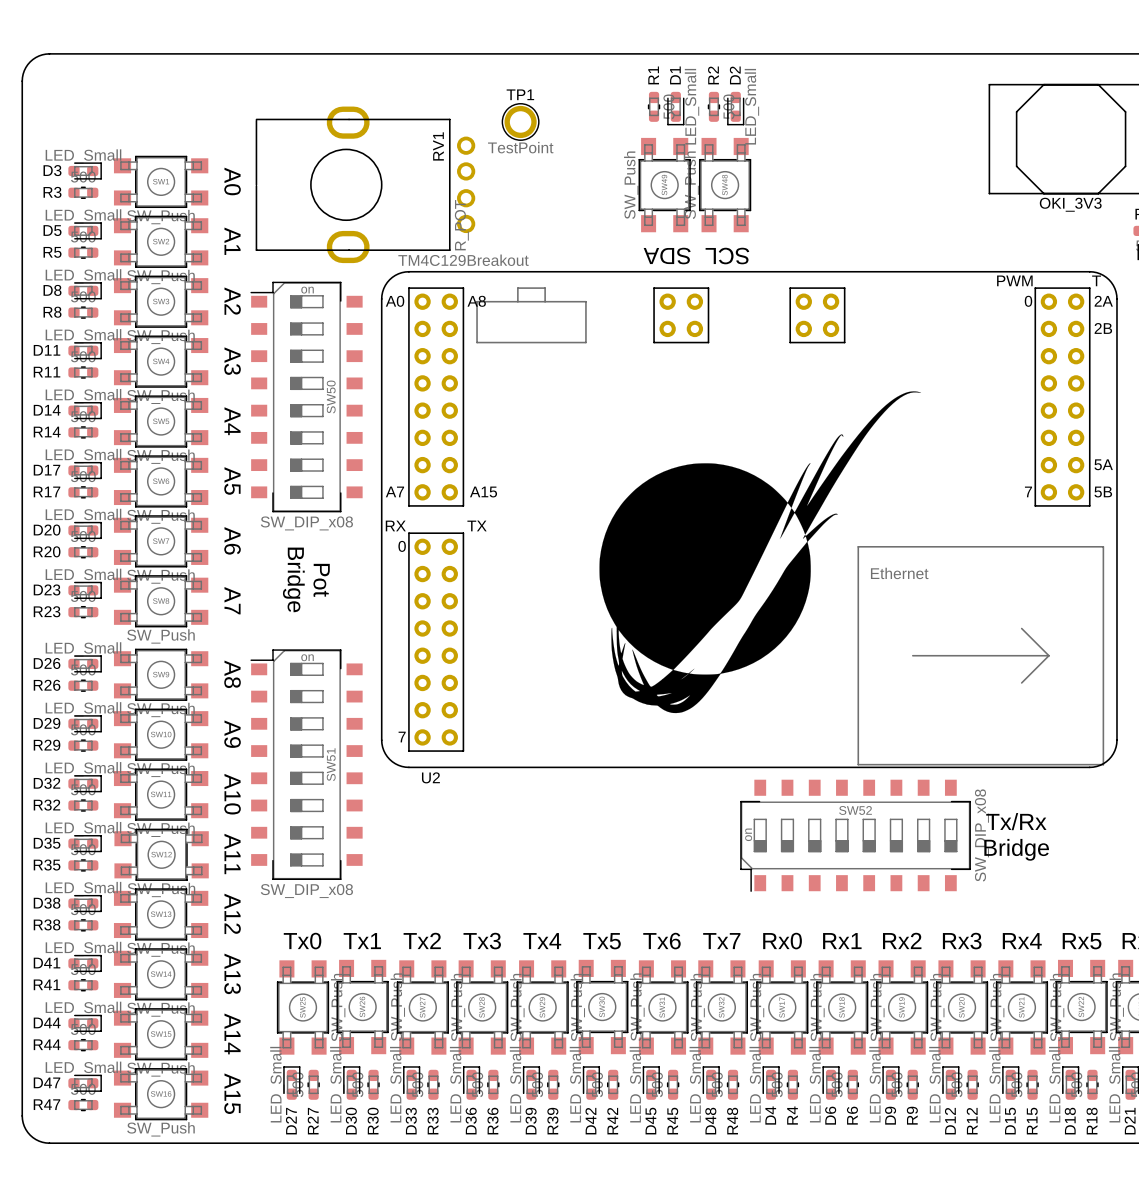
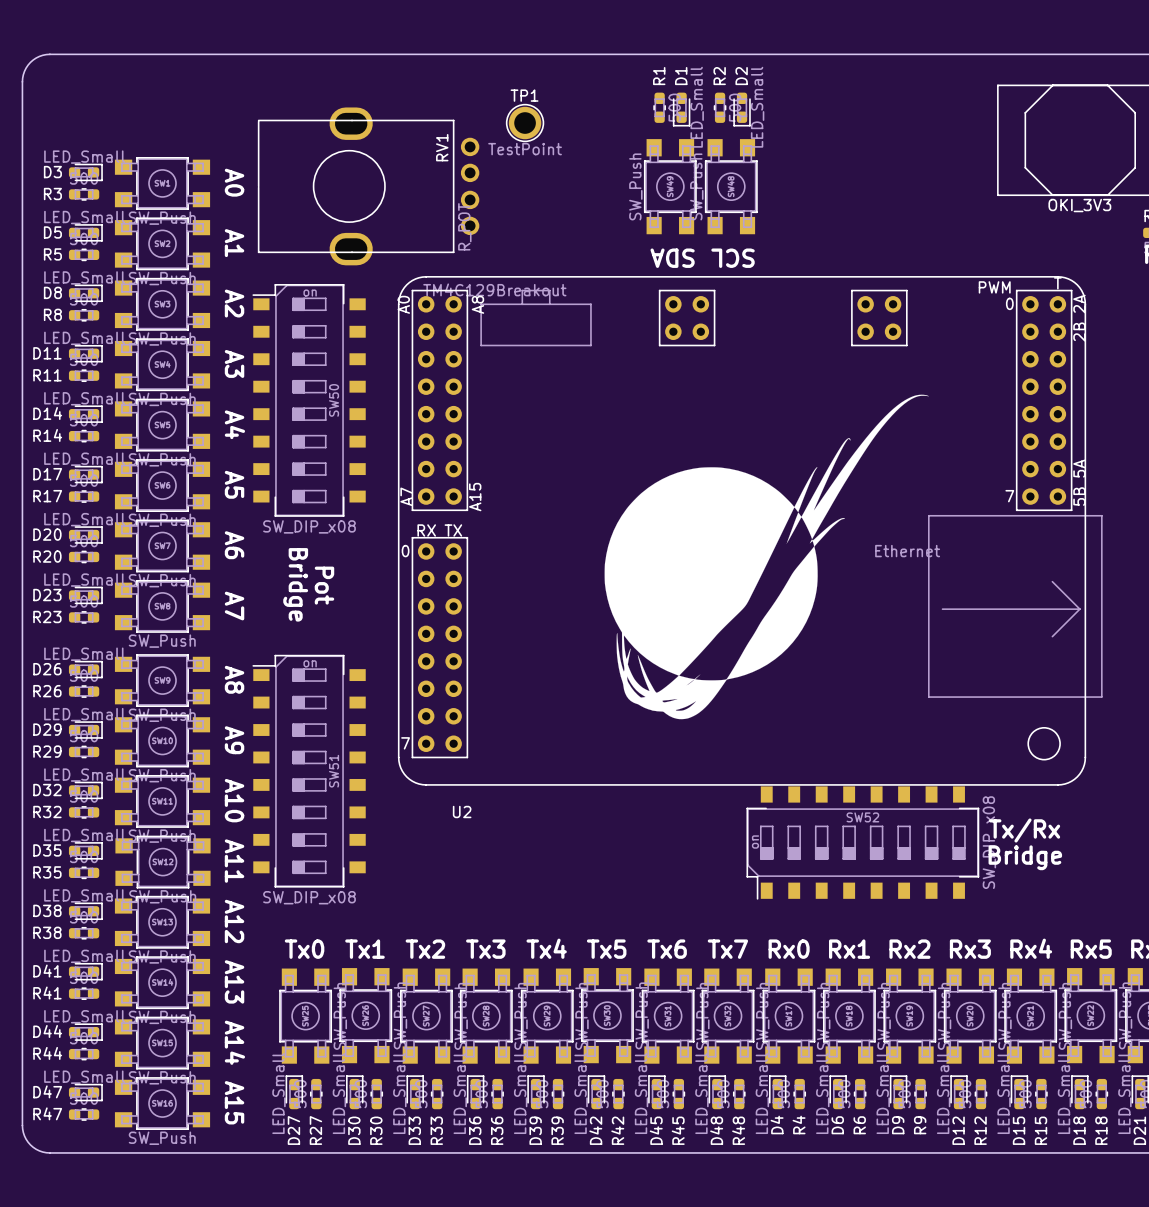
U2 value position: TM4C129Breakout (463, 260) -> TM4C129Breakout (494, 289)
U2 footprint: [380, 270, 1118, 769] -> [397, 276, 1103, 786]
U2 name position: U2 (430, 777) -> U2 (462, 812)

